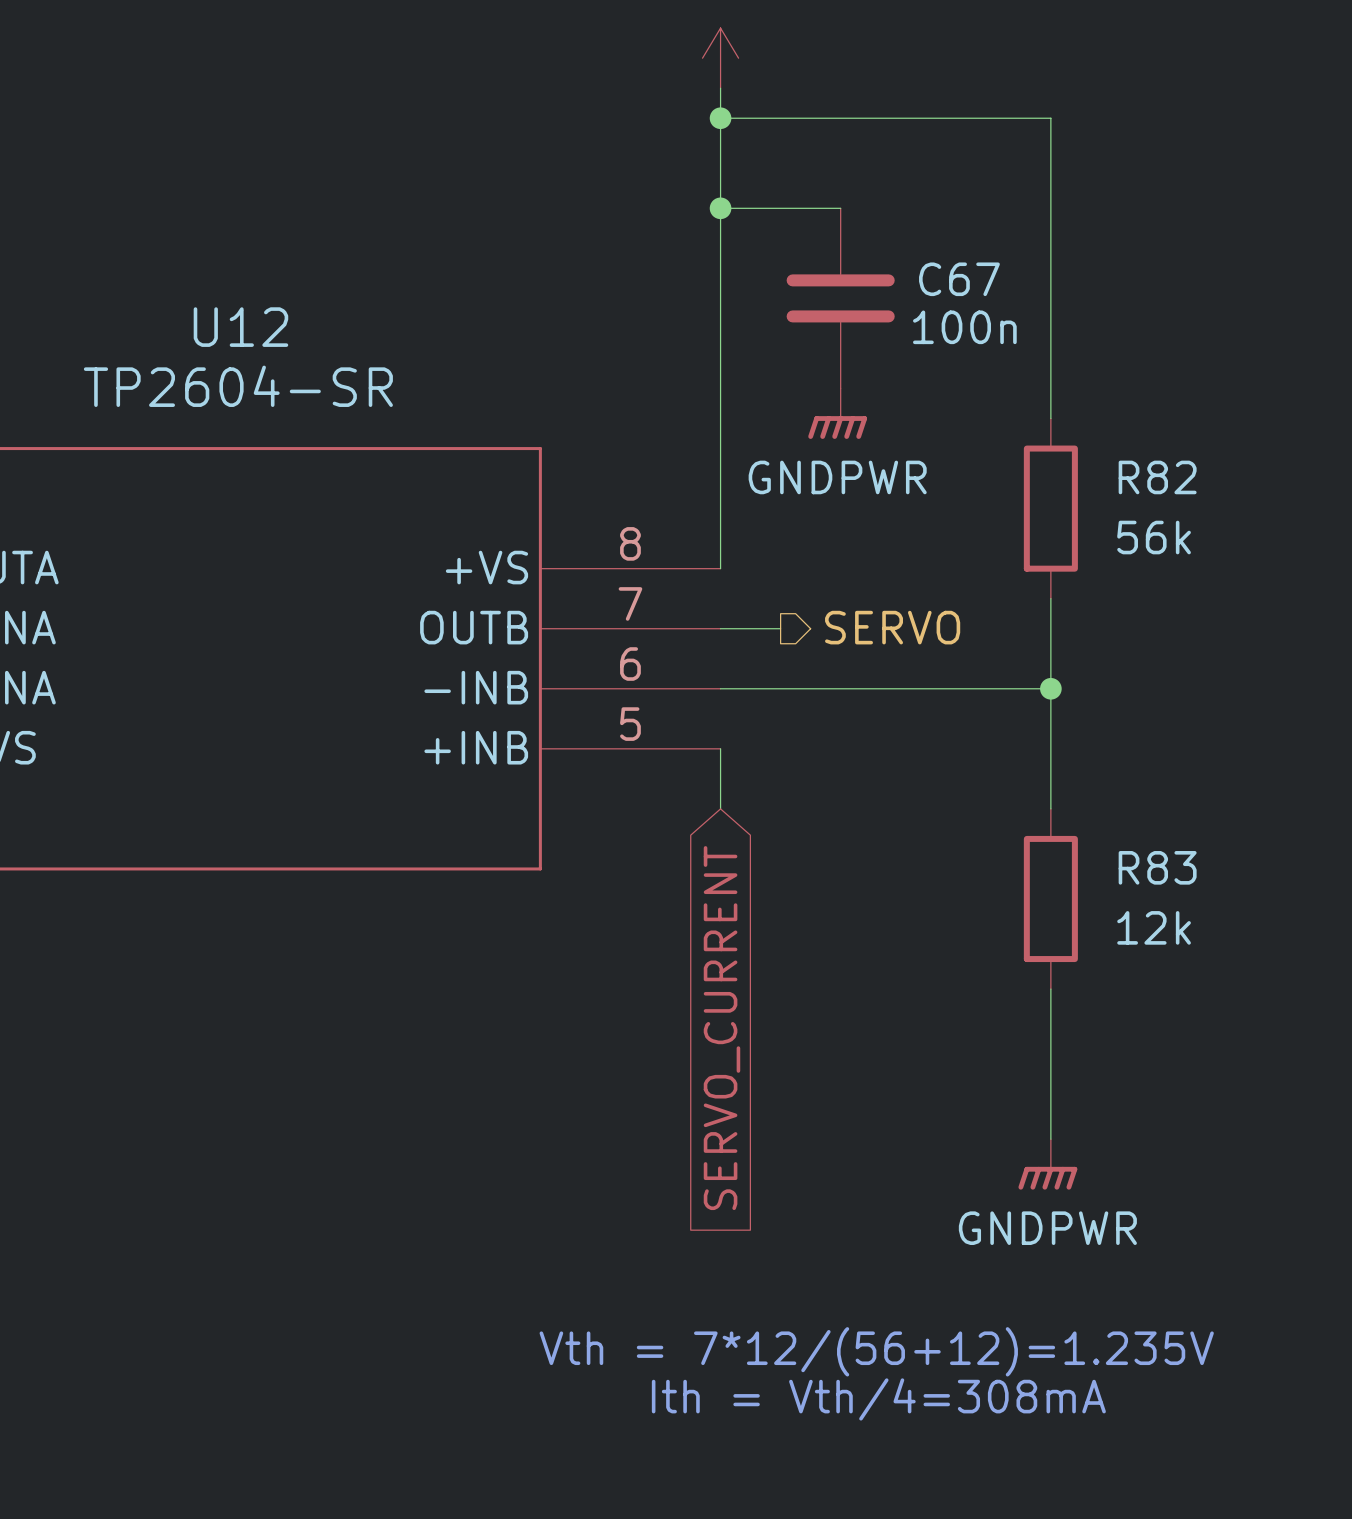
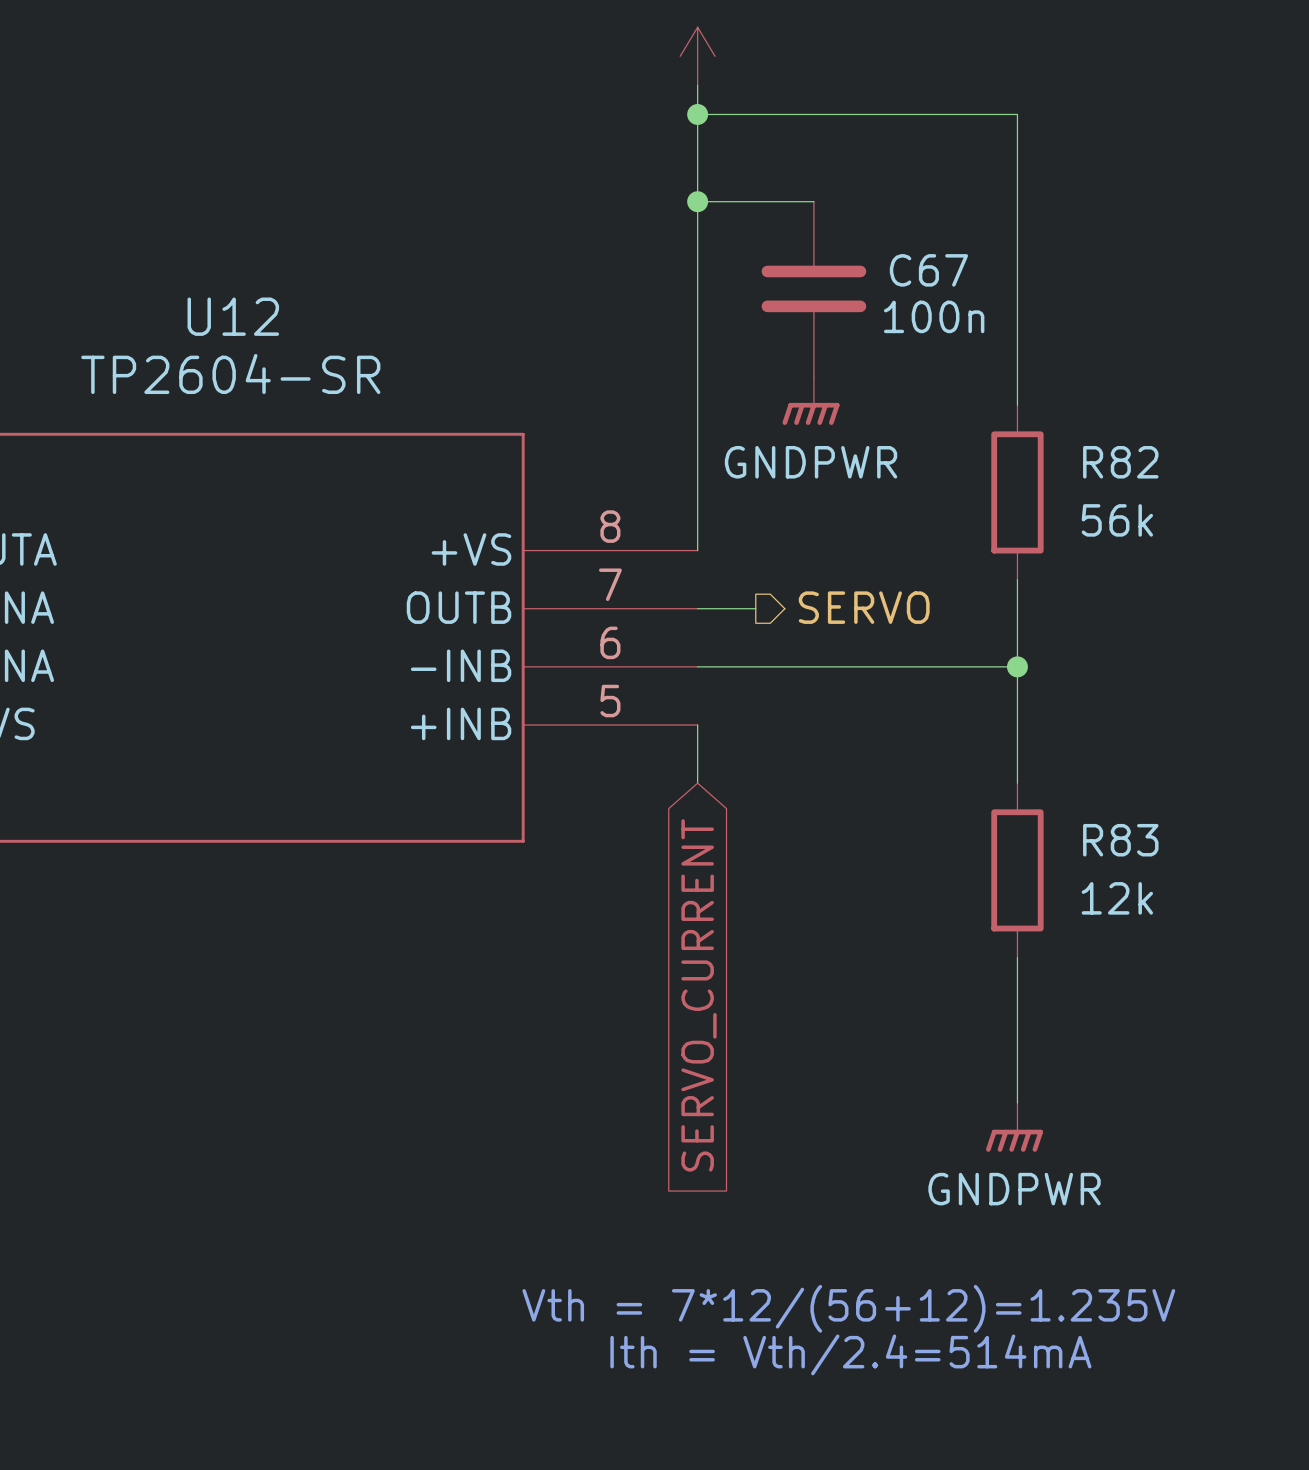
text: Ith = Vth/4=308mA (878, 1399) -> Ith = Vth/2.4=514mA (850, 1354)

